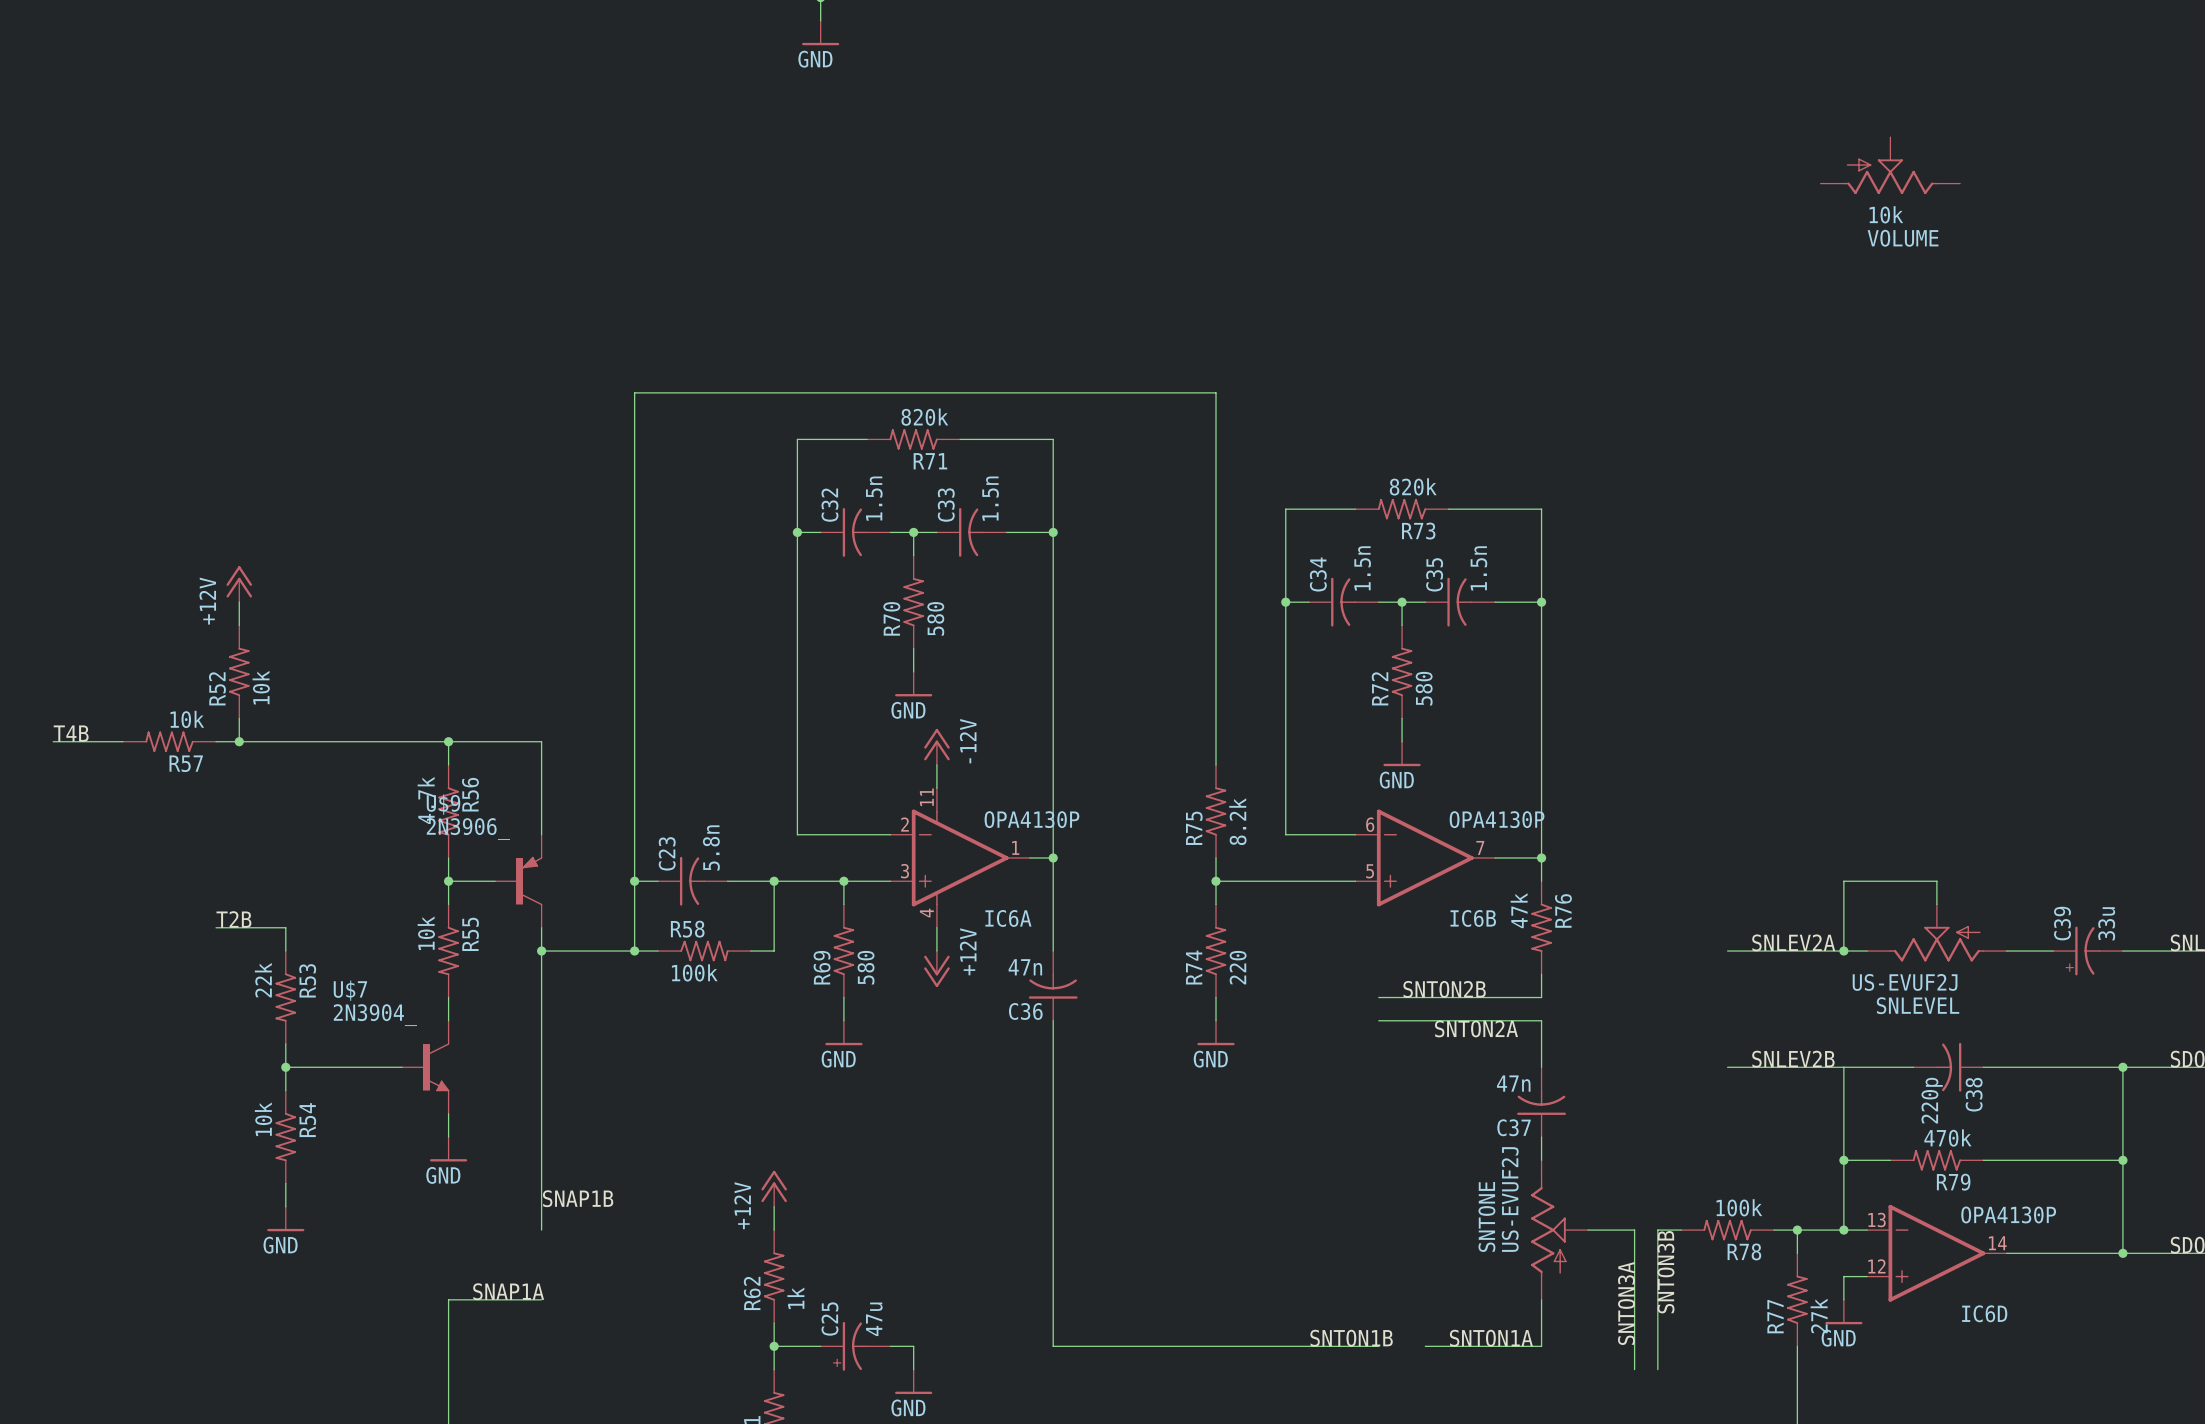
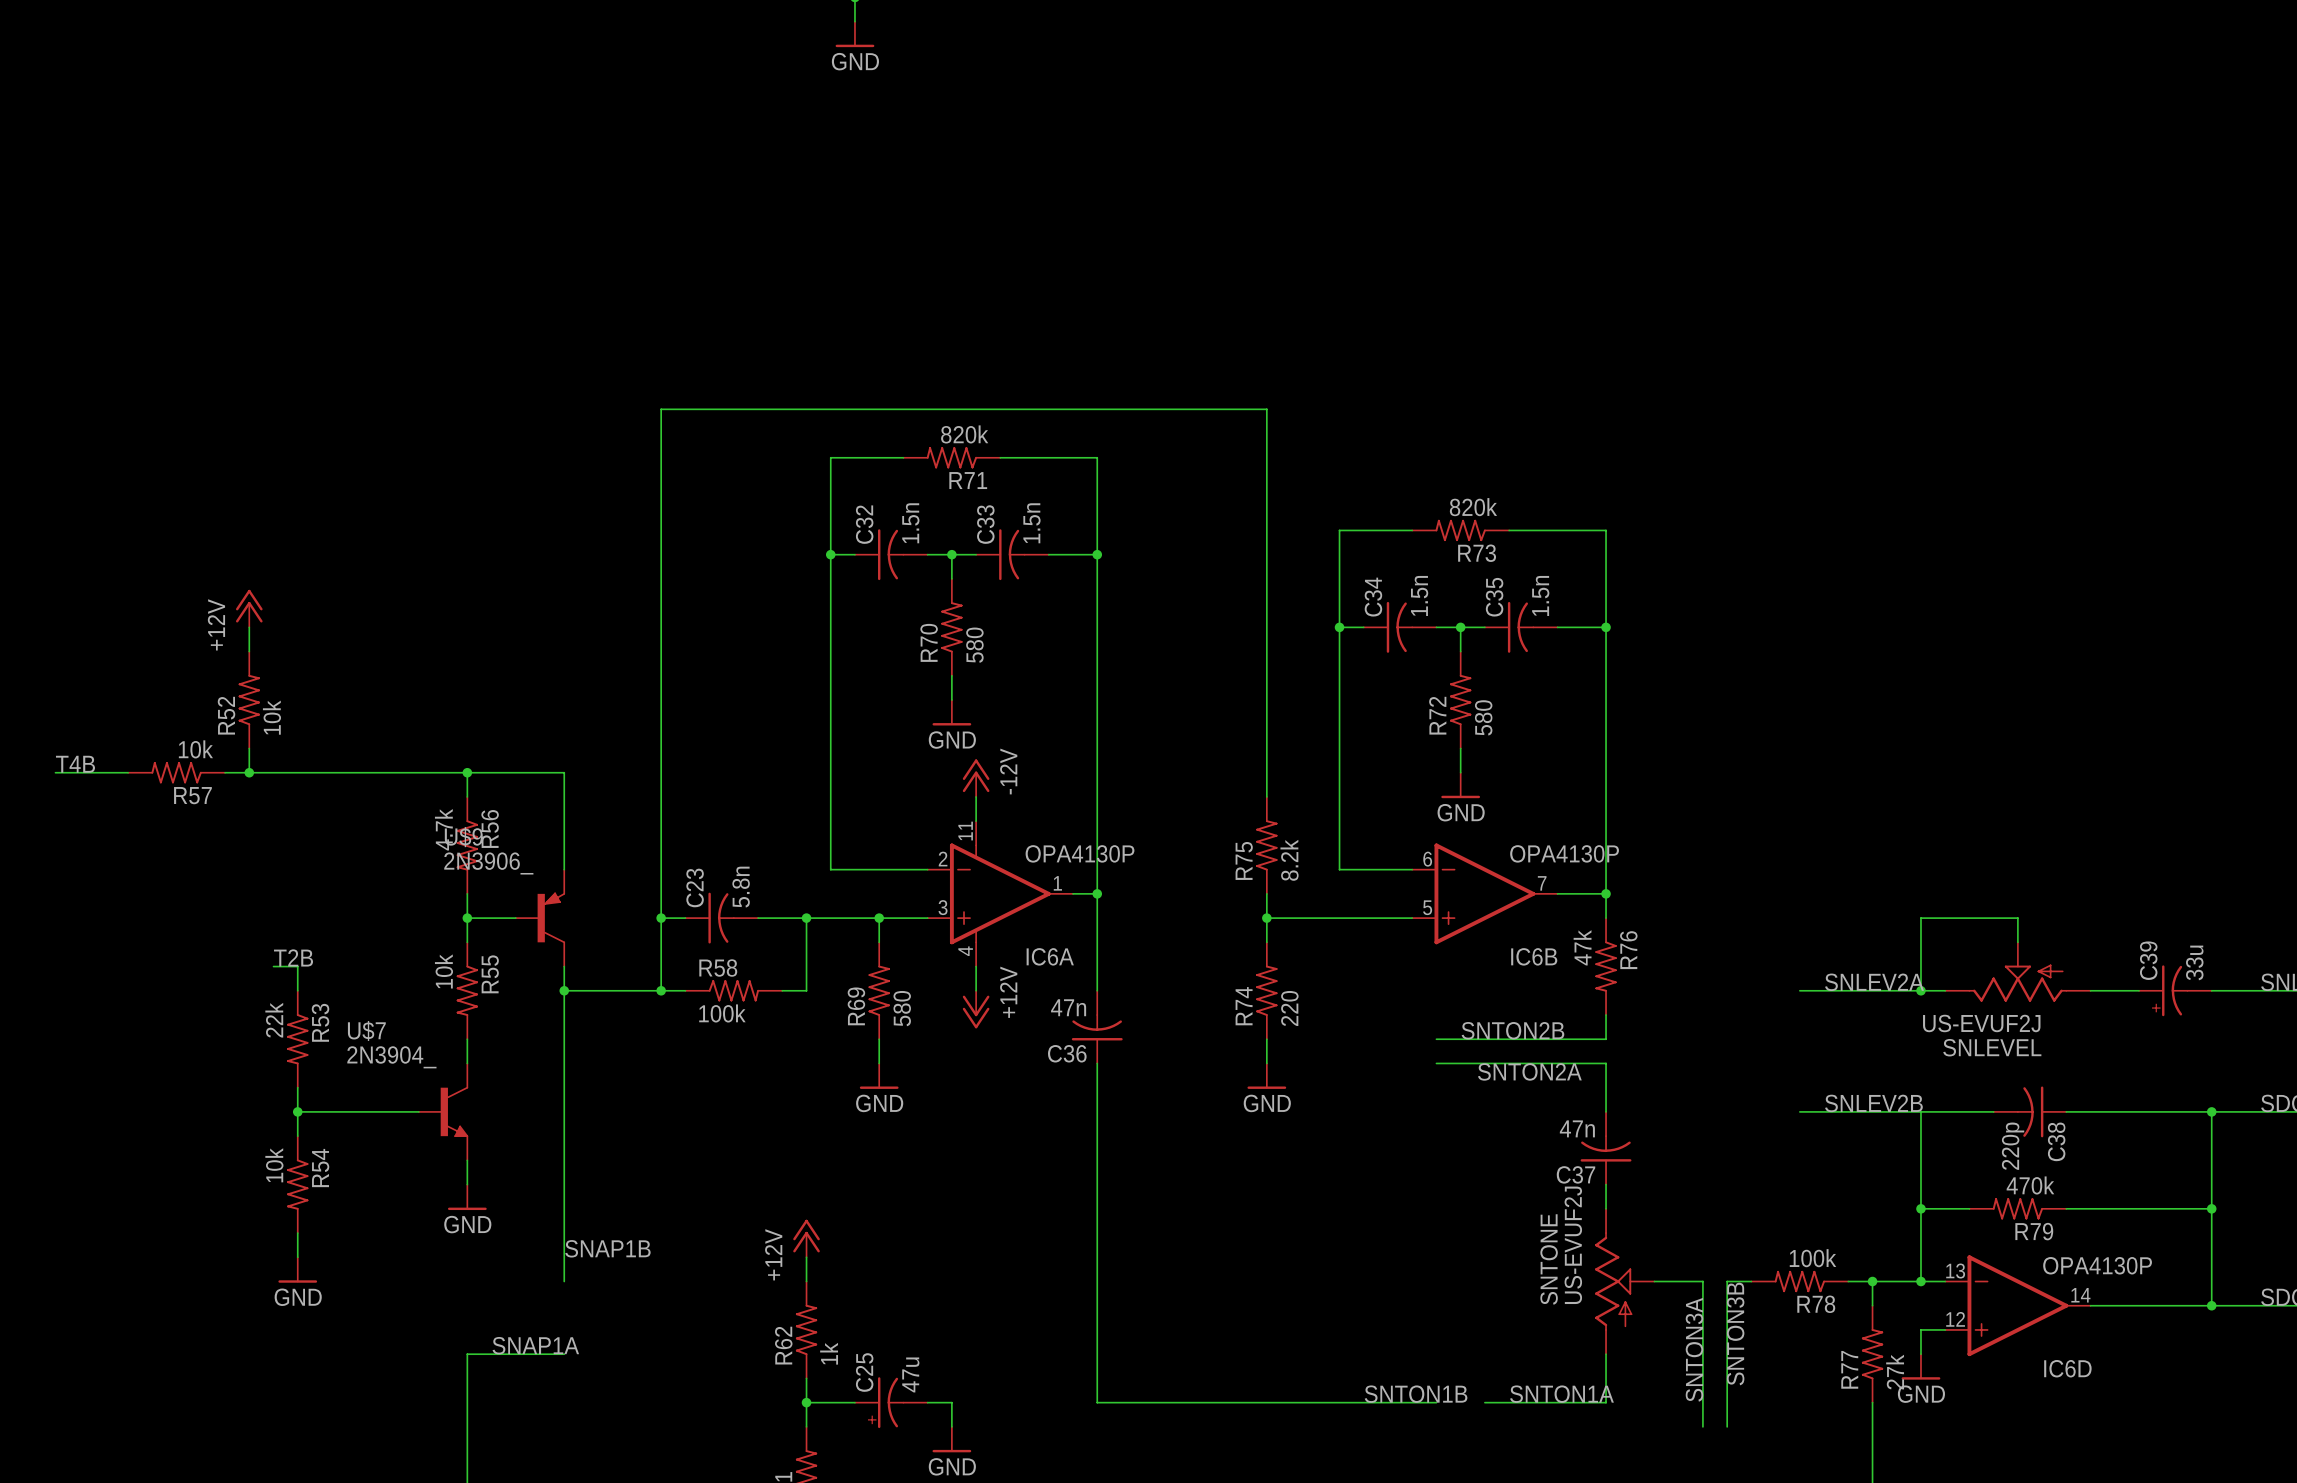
VOLUME: 10k (1890, 165) -> none
label position: T2B (233, 919) -> T2B (293, 957)
wire: (216, 927) (262, 927) -> none

